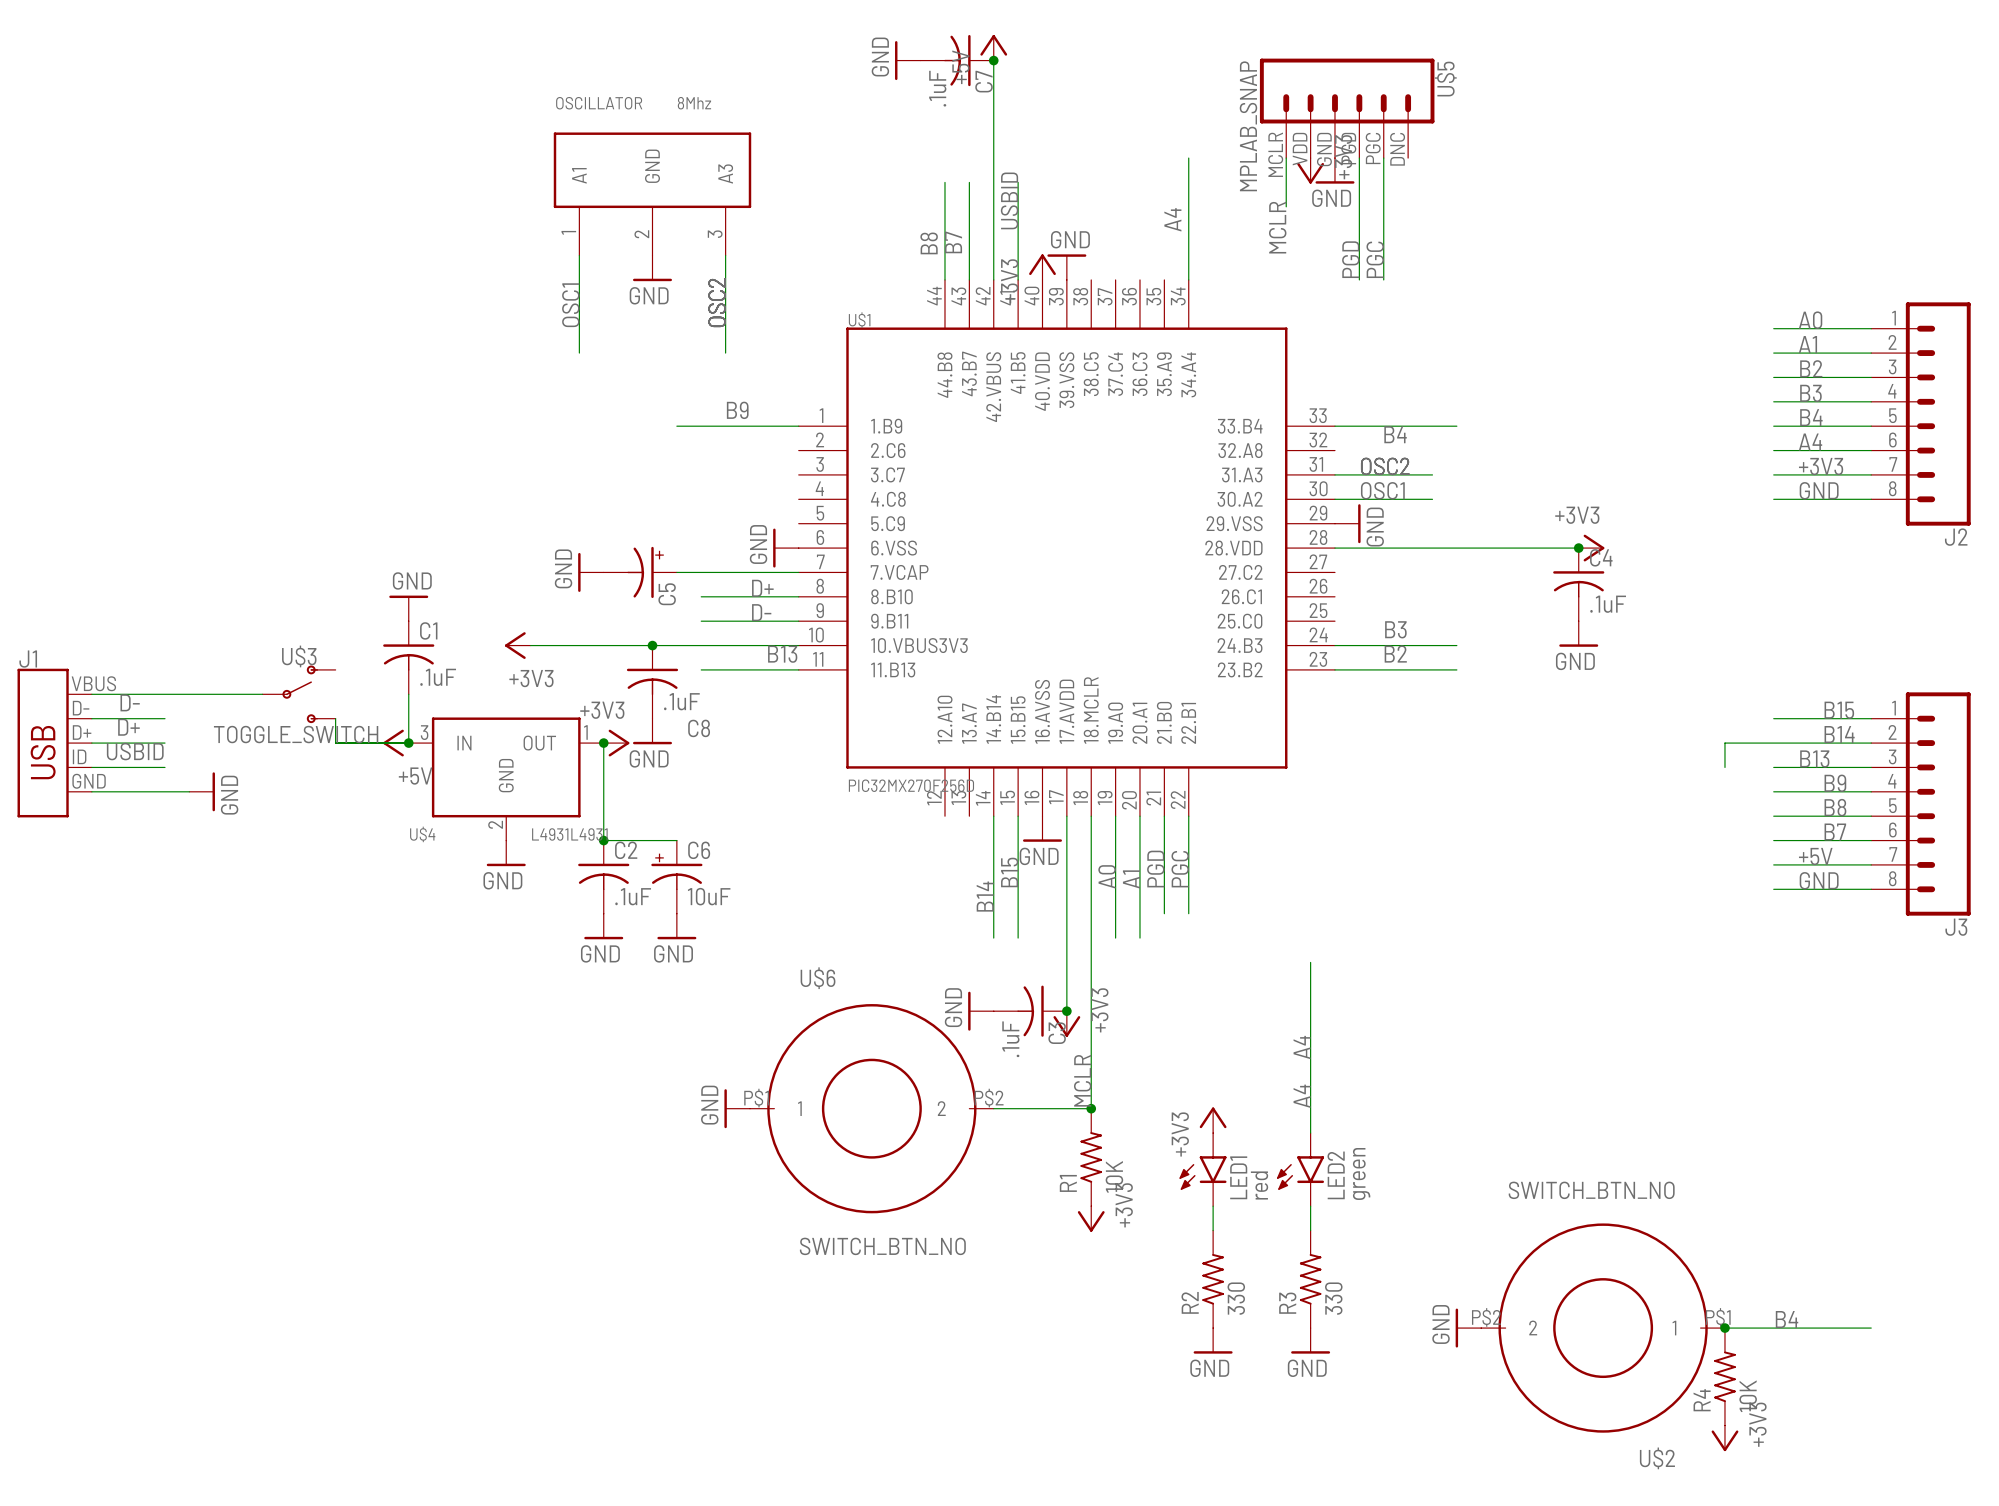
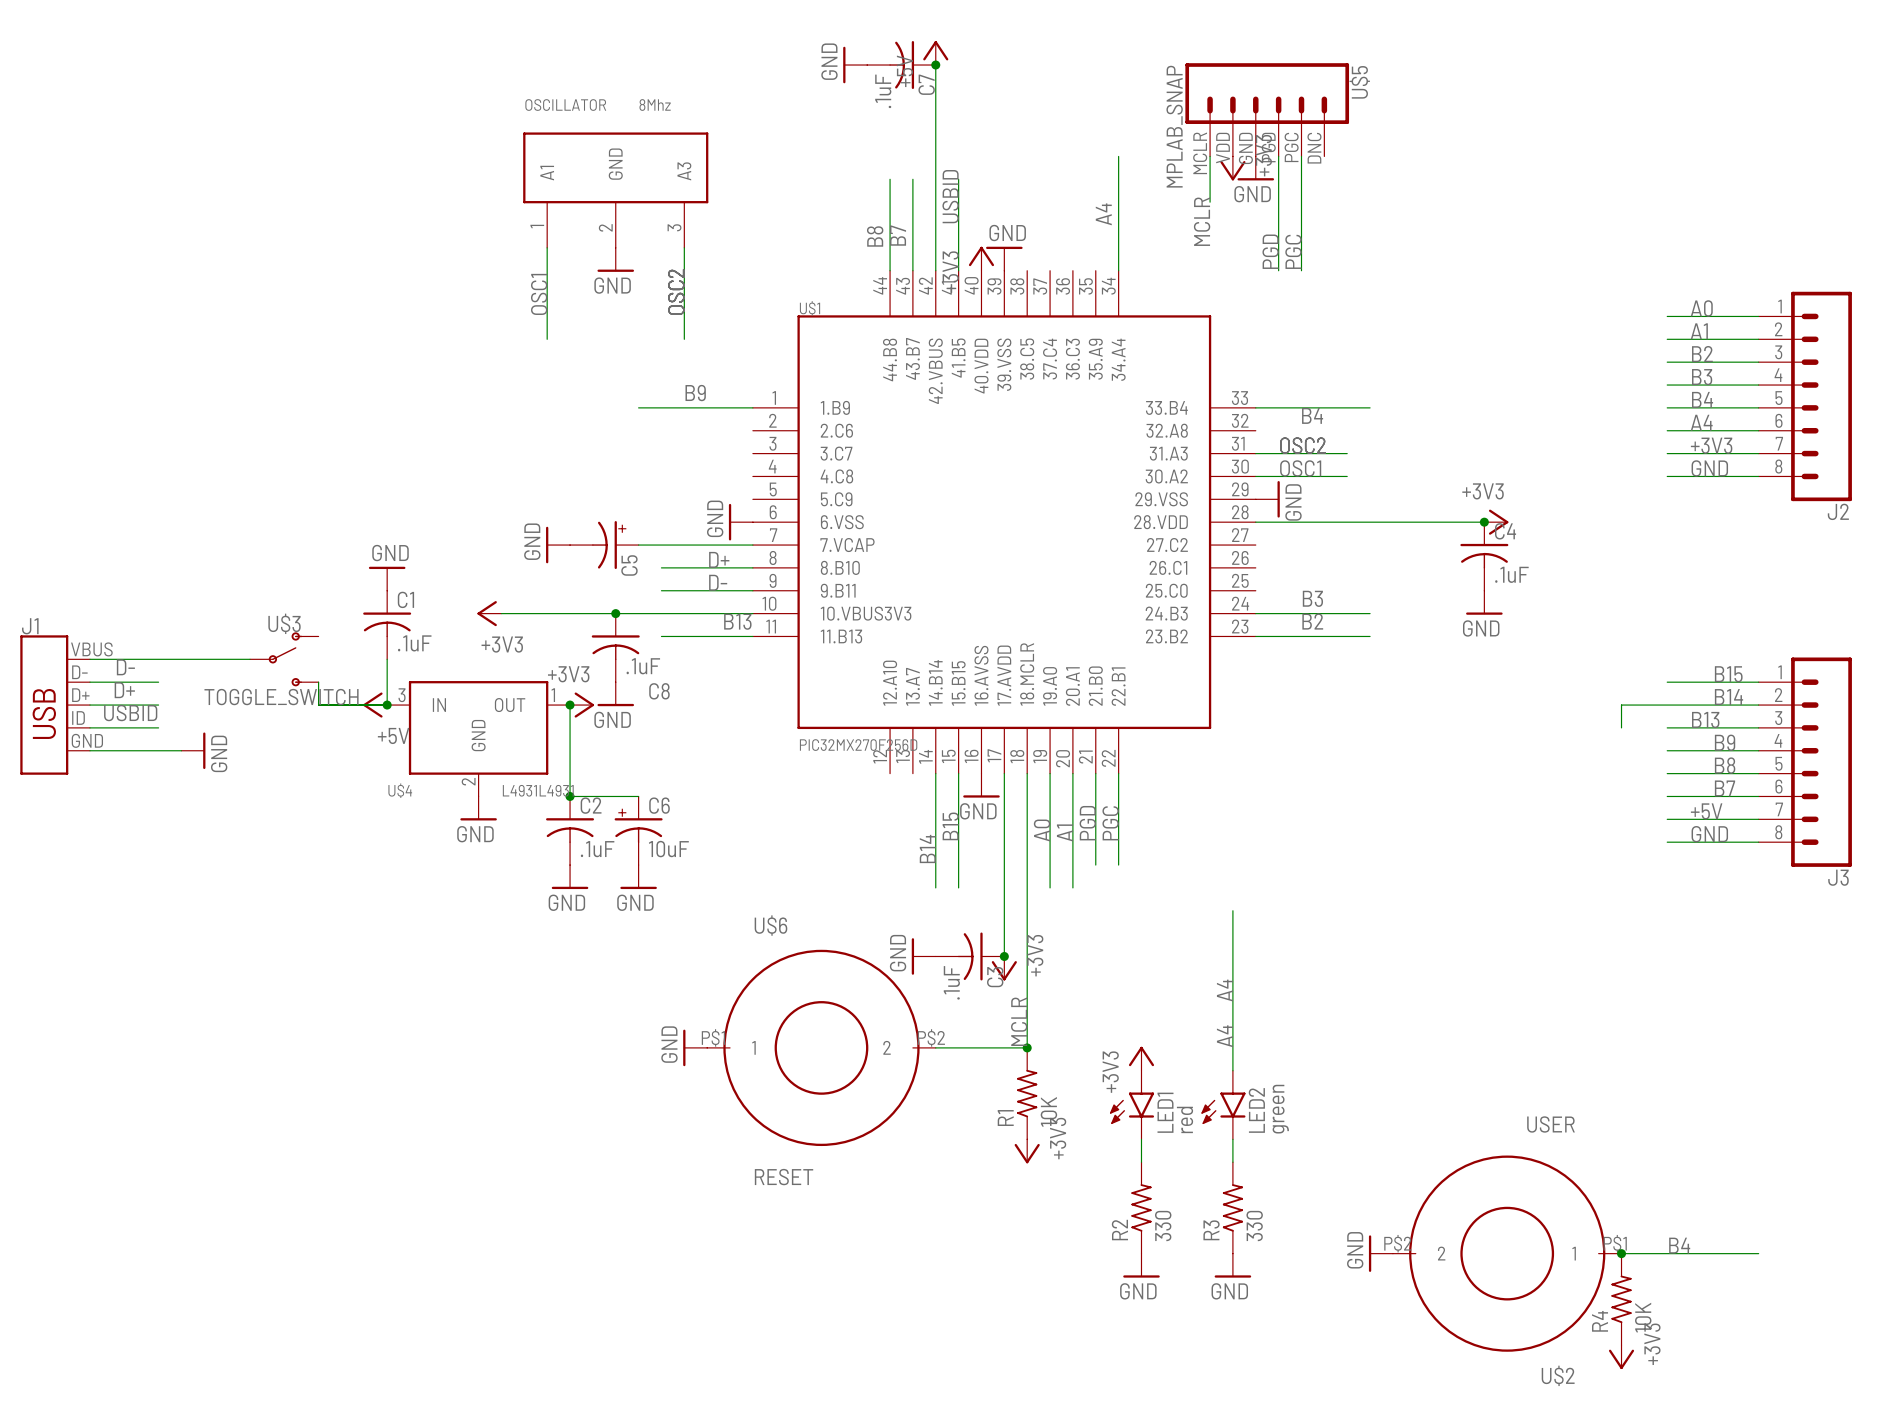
U$2 value: SWITCH_BTN_NO (1591, 1190) -> USER (1550, 1124)
U$6 value: SWITCH_BTN_NO (882, 1246) -> RESET (784, 1177)

